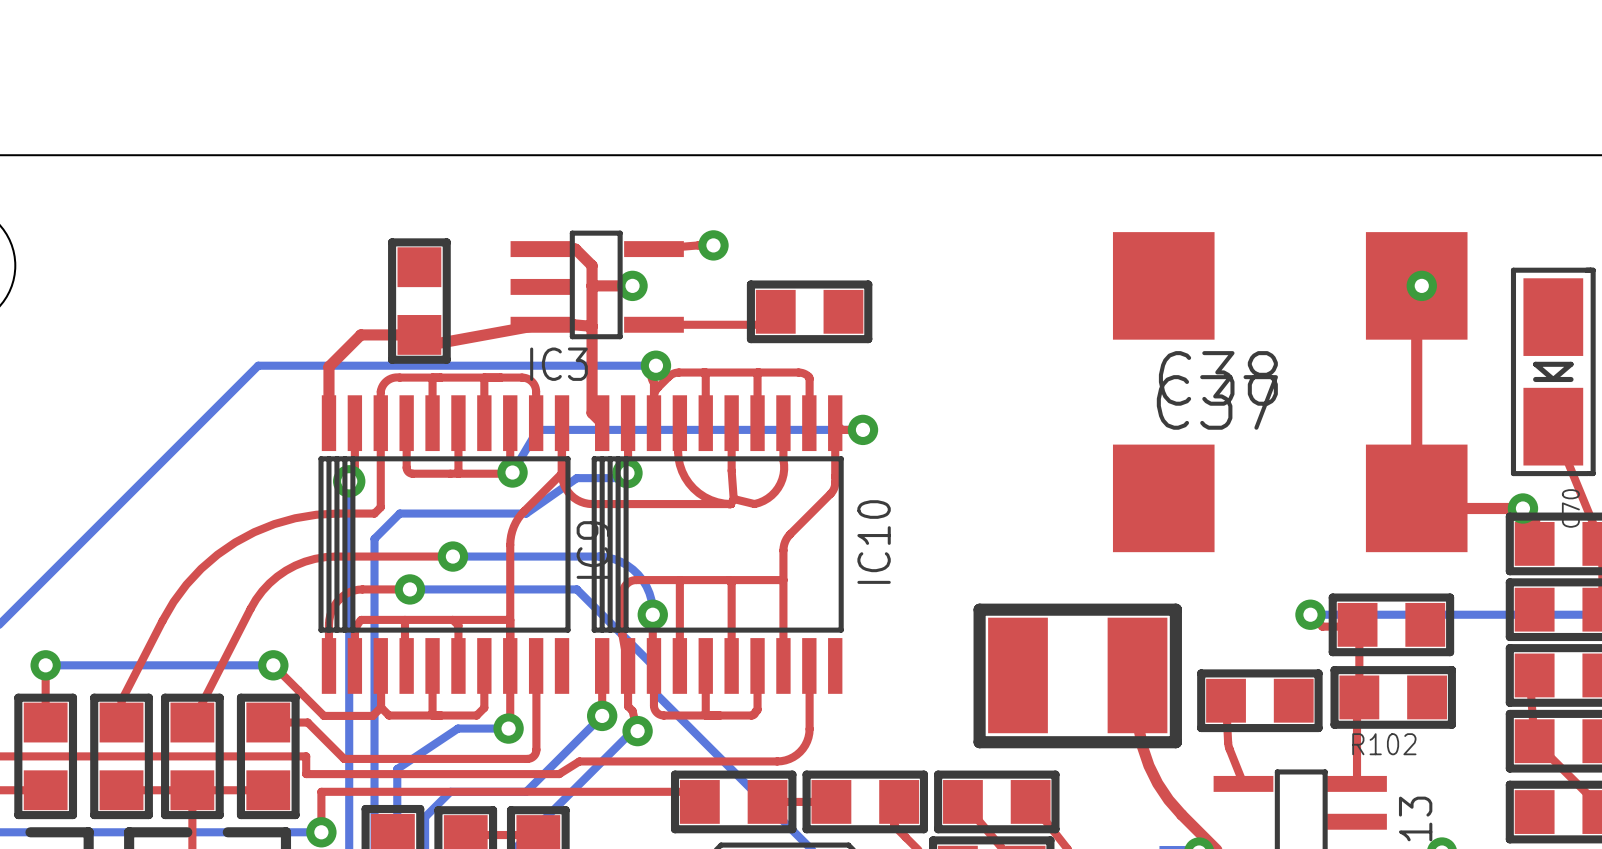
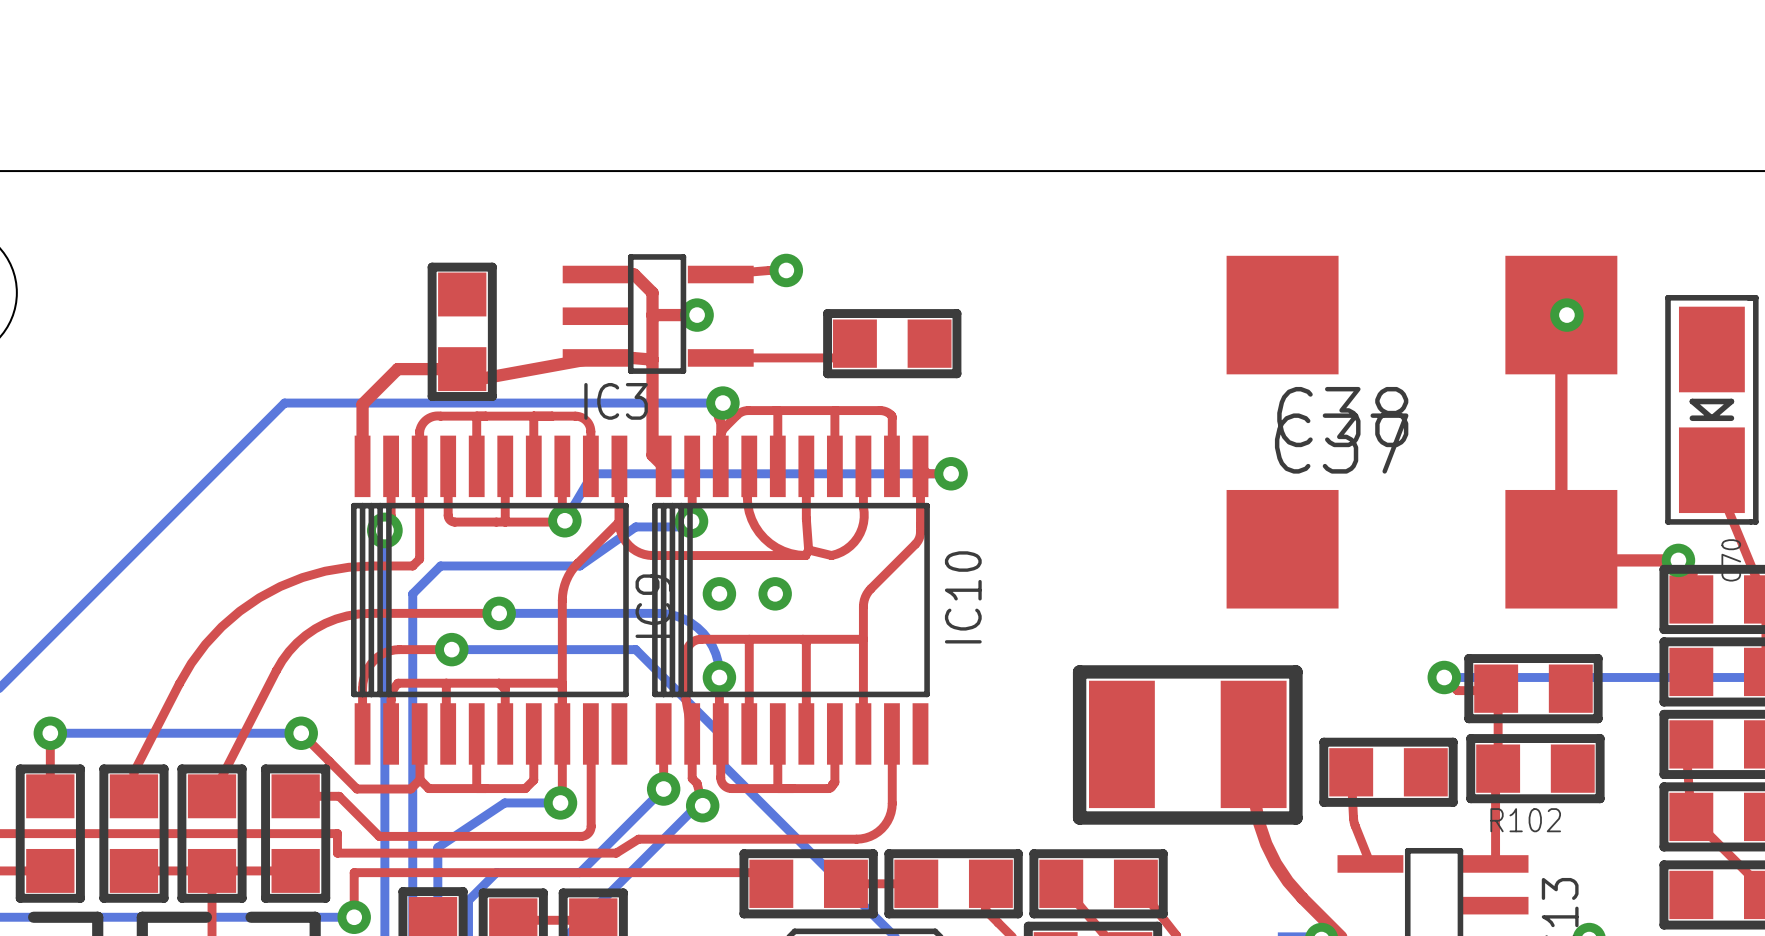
via: none -> (719, 593)
via: none -> (775, 593)

